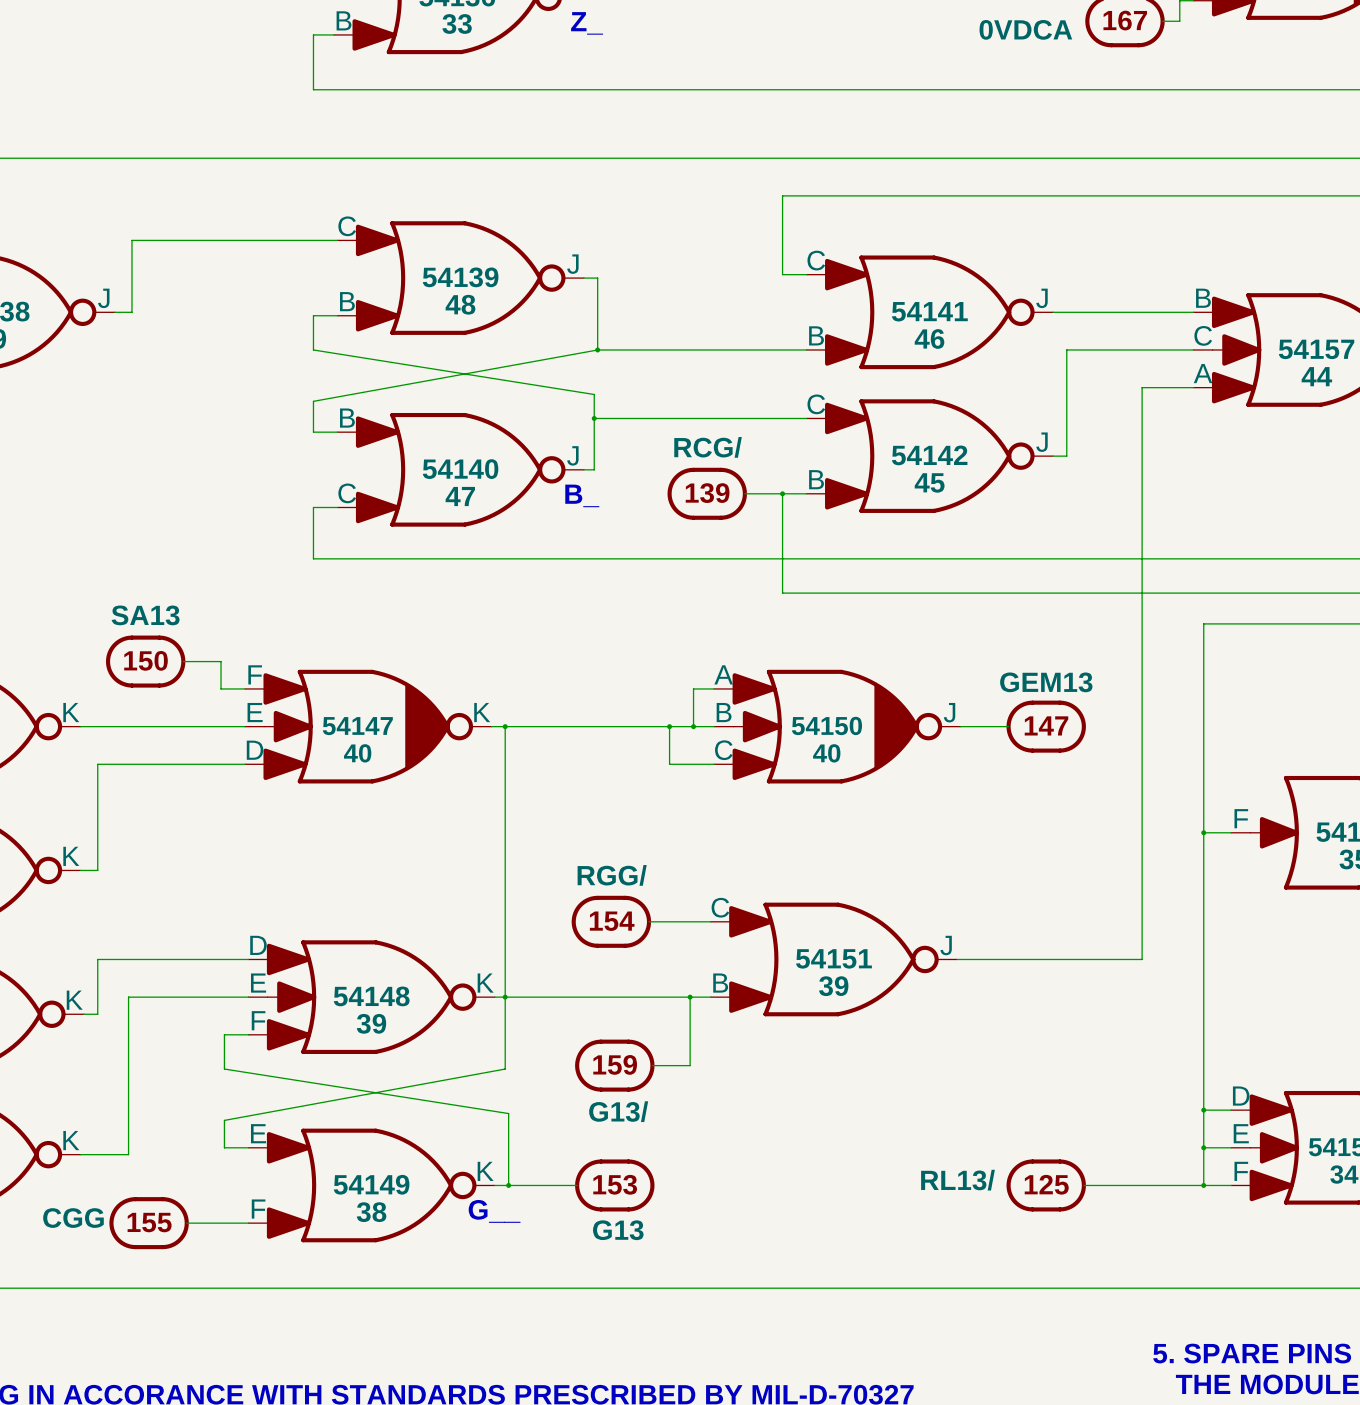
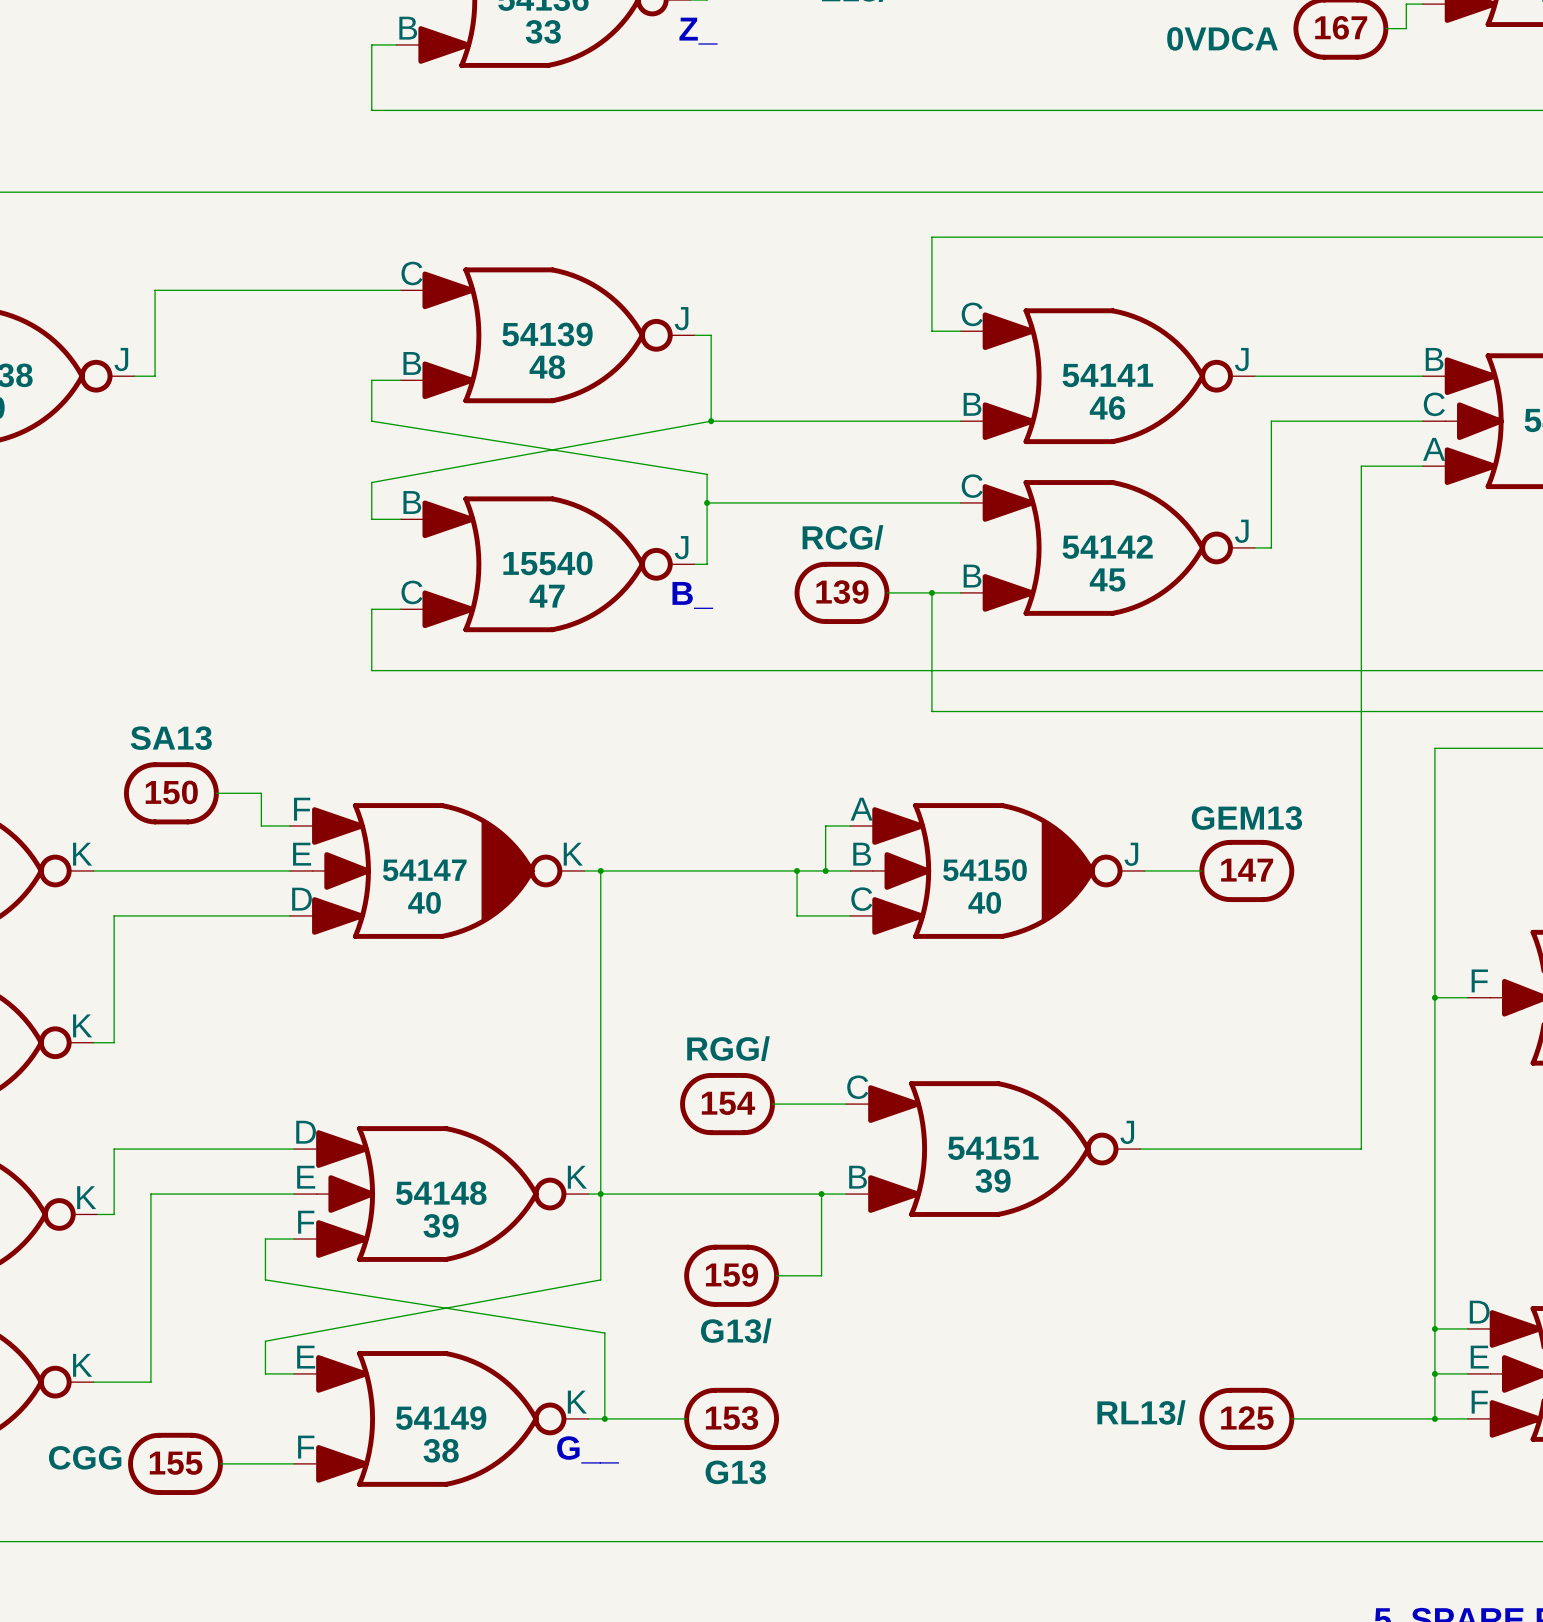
part text: 54140 (460, 469) -> 15540 (547, 563)

